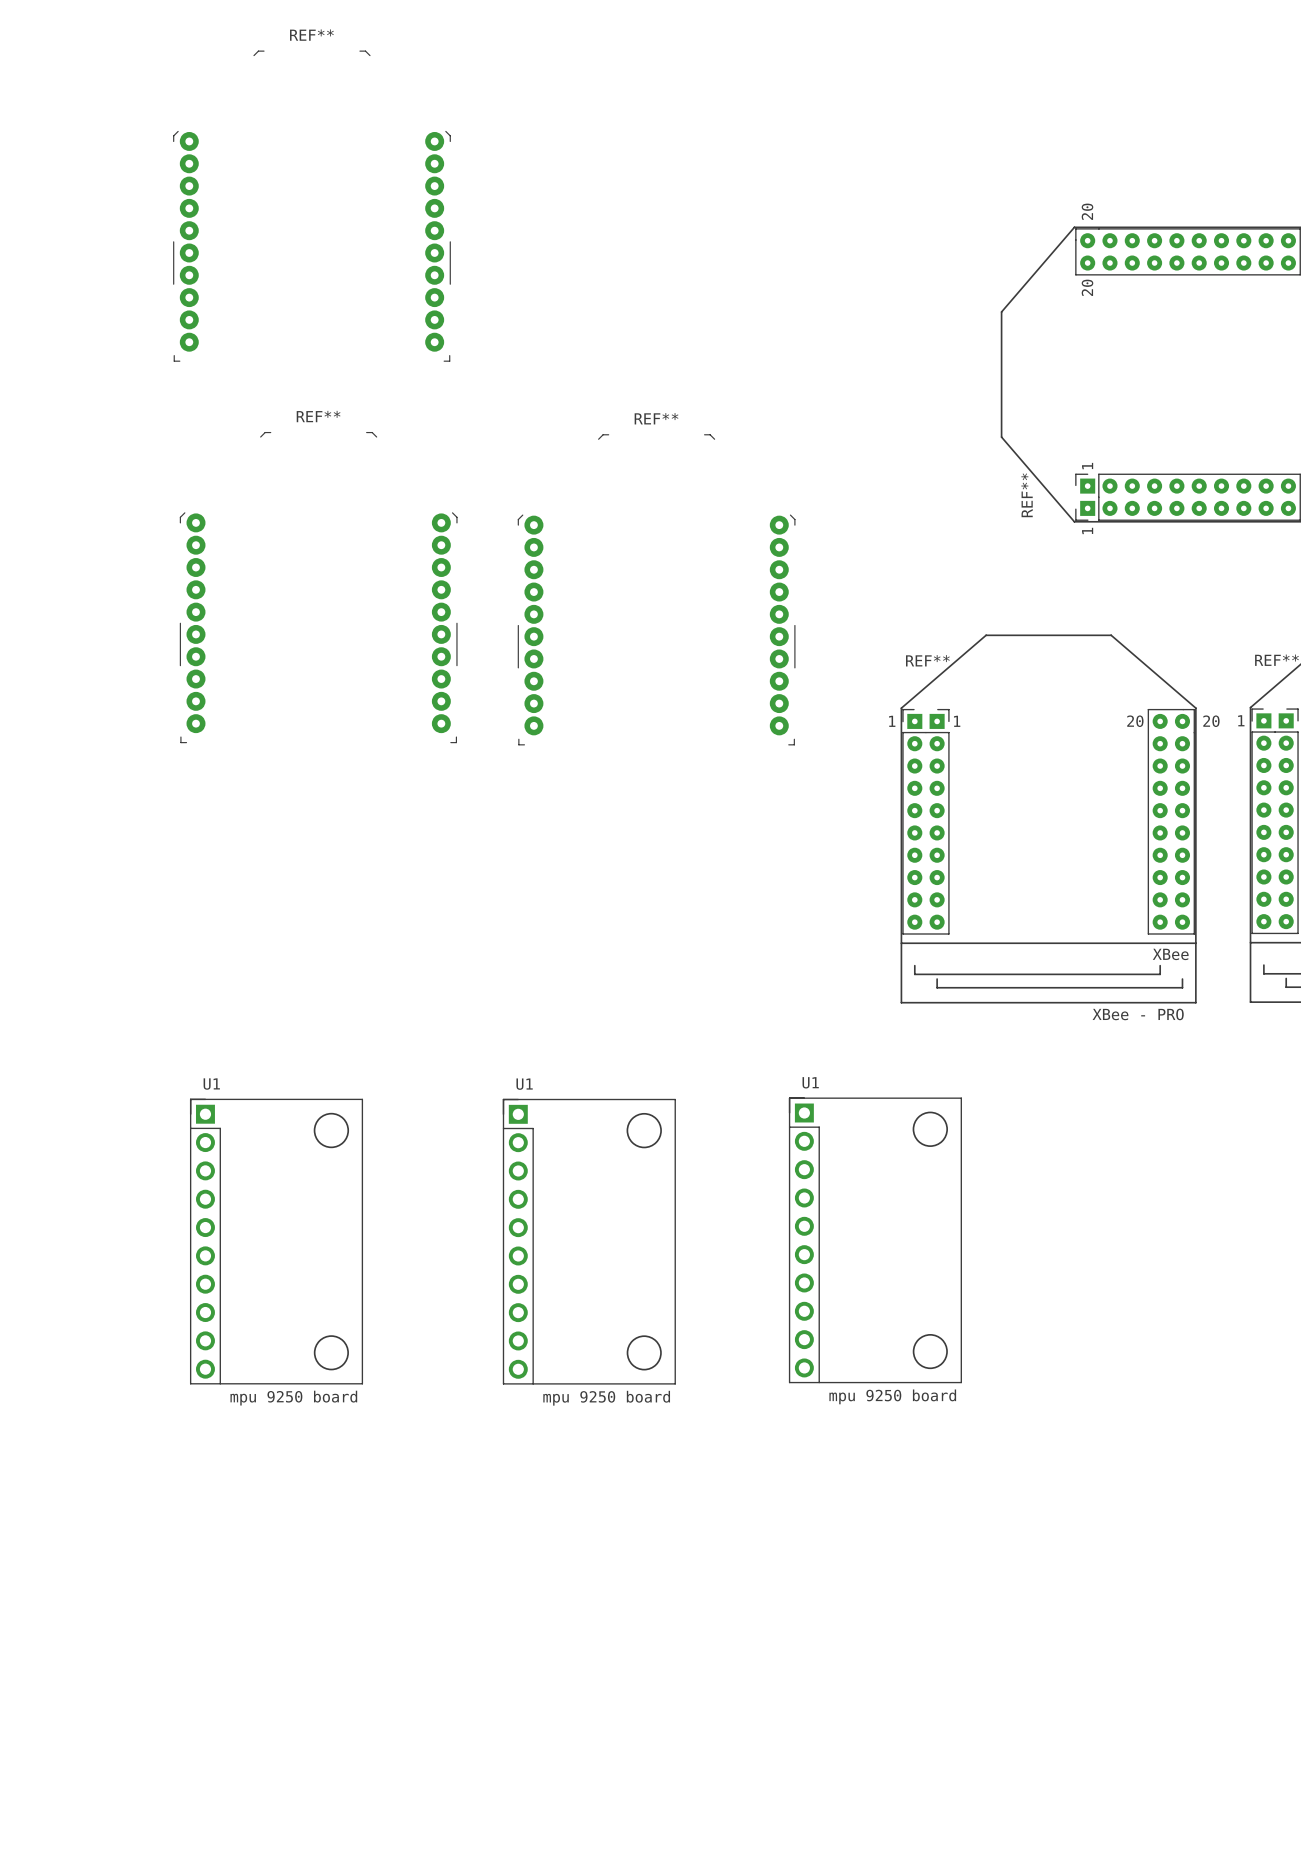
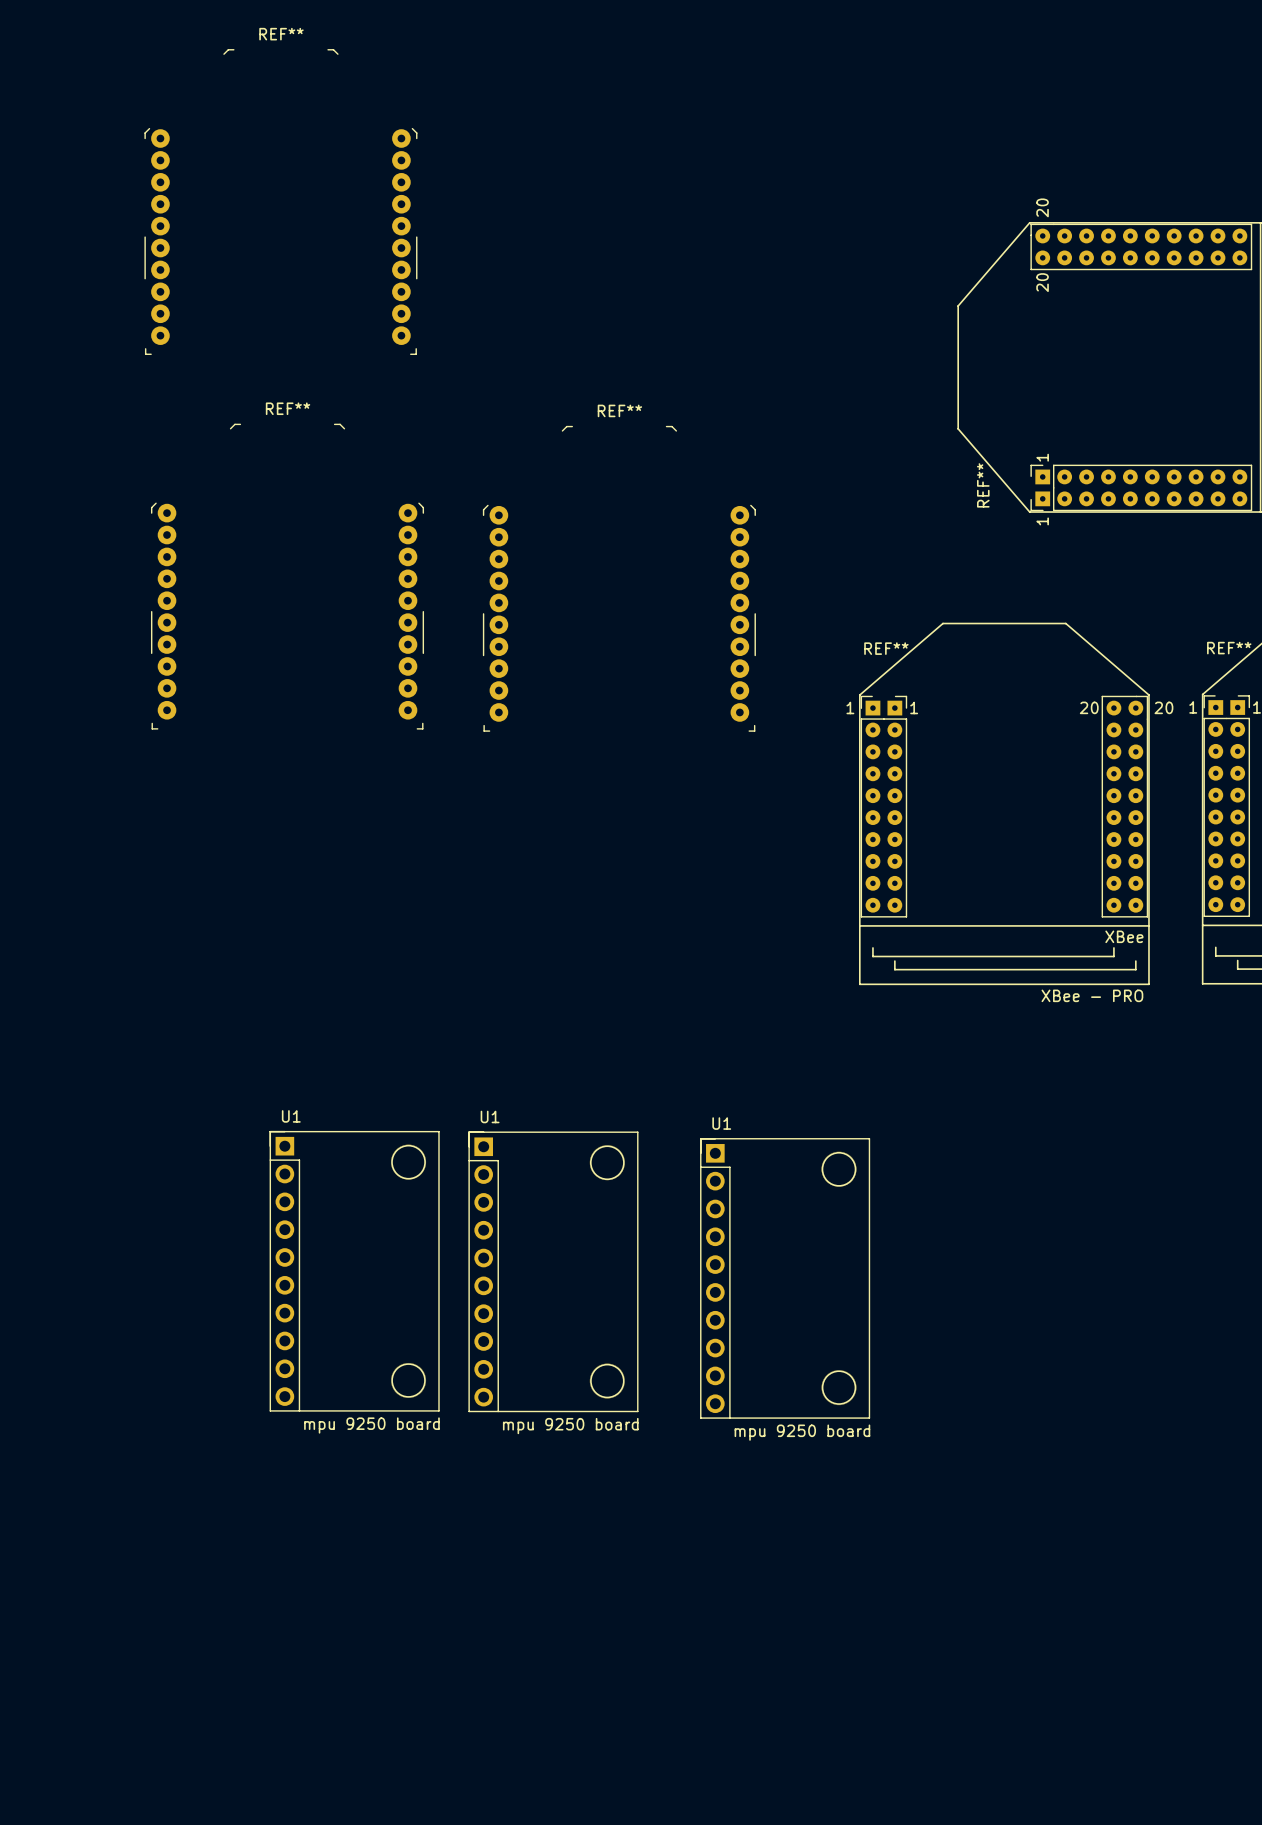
U1: (875, 1240) -> none
U1: (276, 1241) -> none
U1: (589, 1241) -> none
U1: none -> (354, 1271)
U1: none -> (553, 1271)
U1: none -> (785, 1278)

